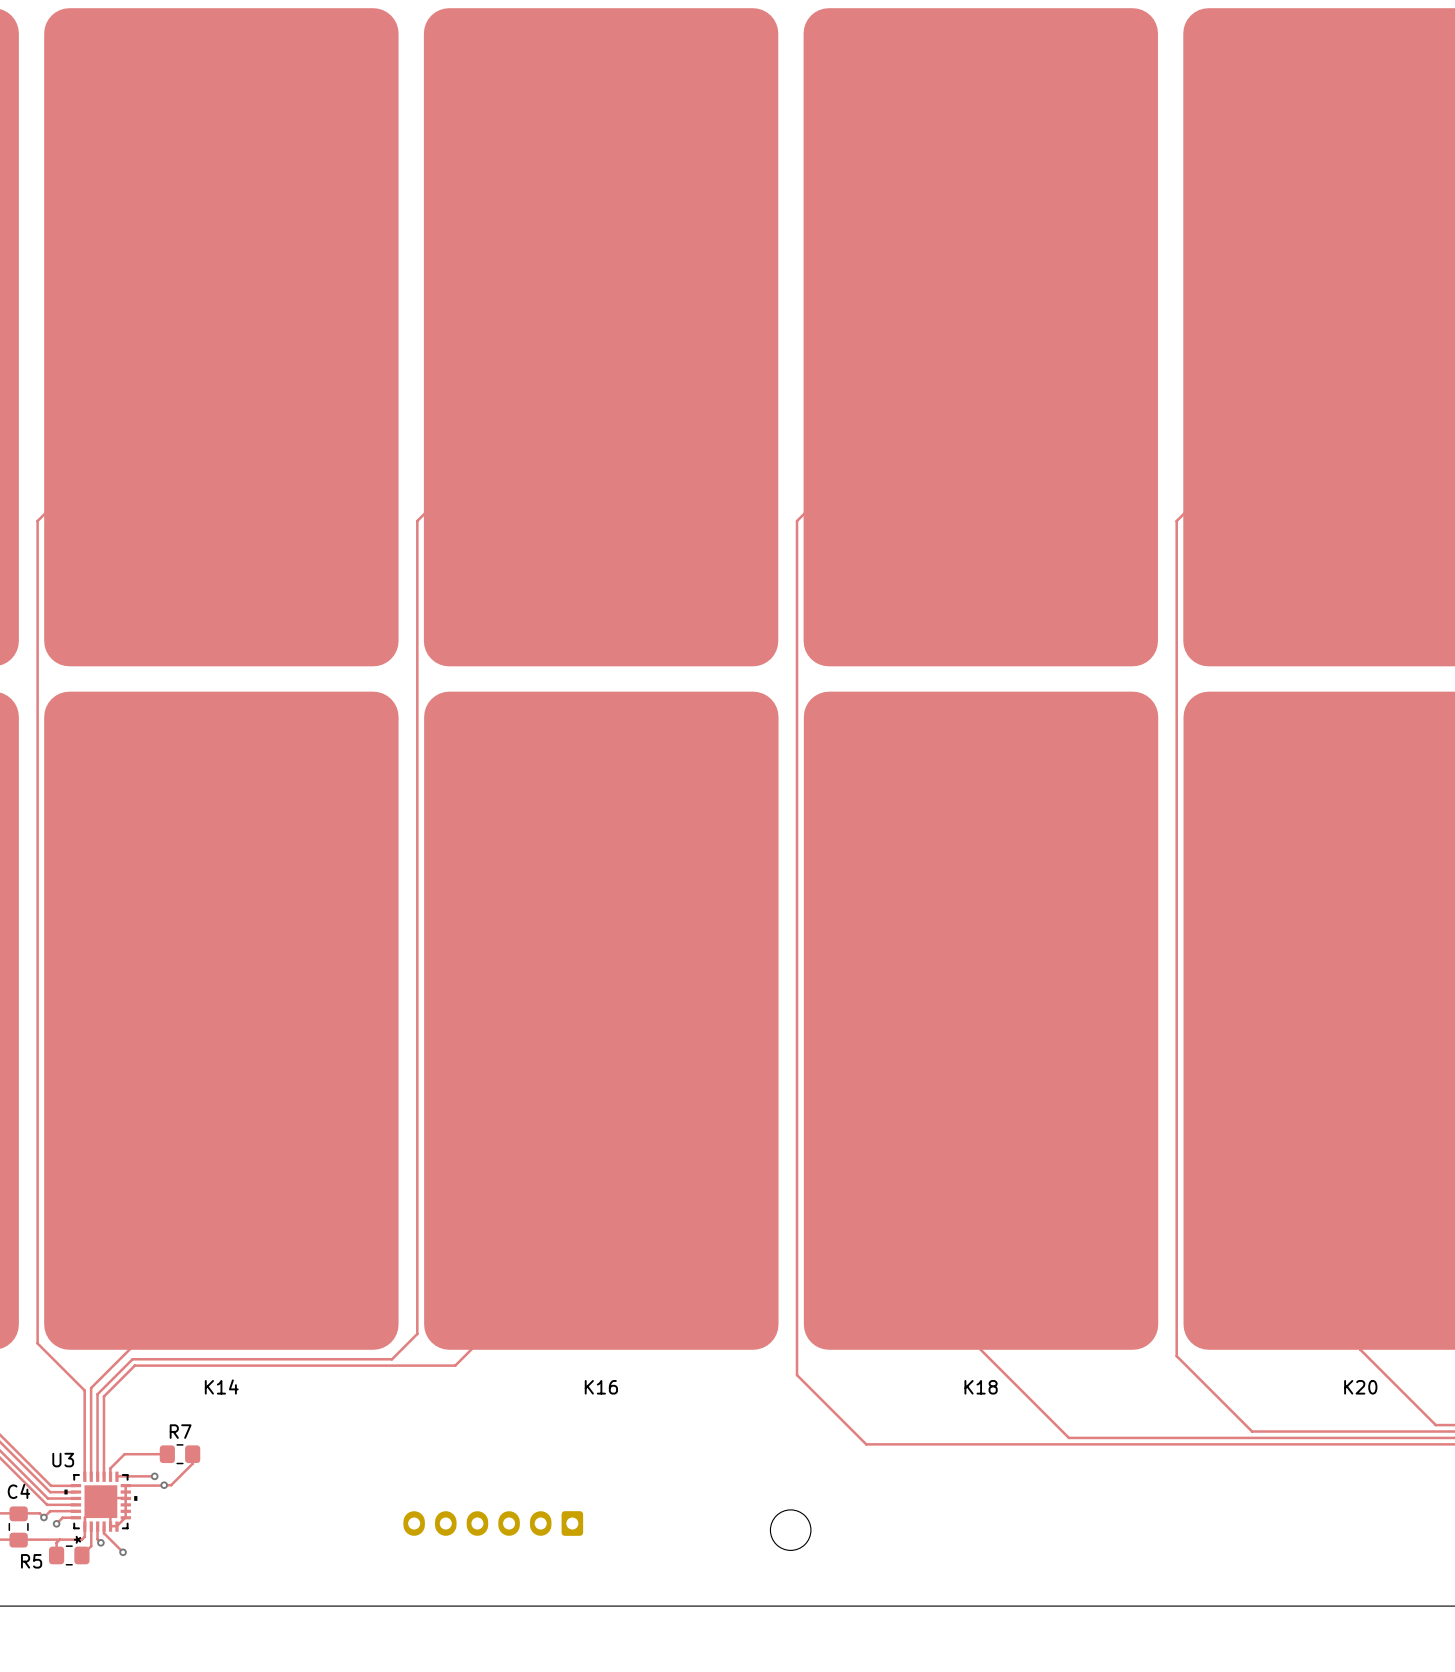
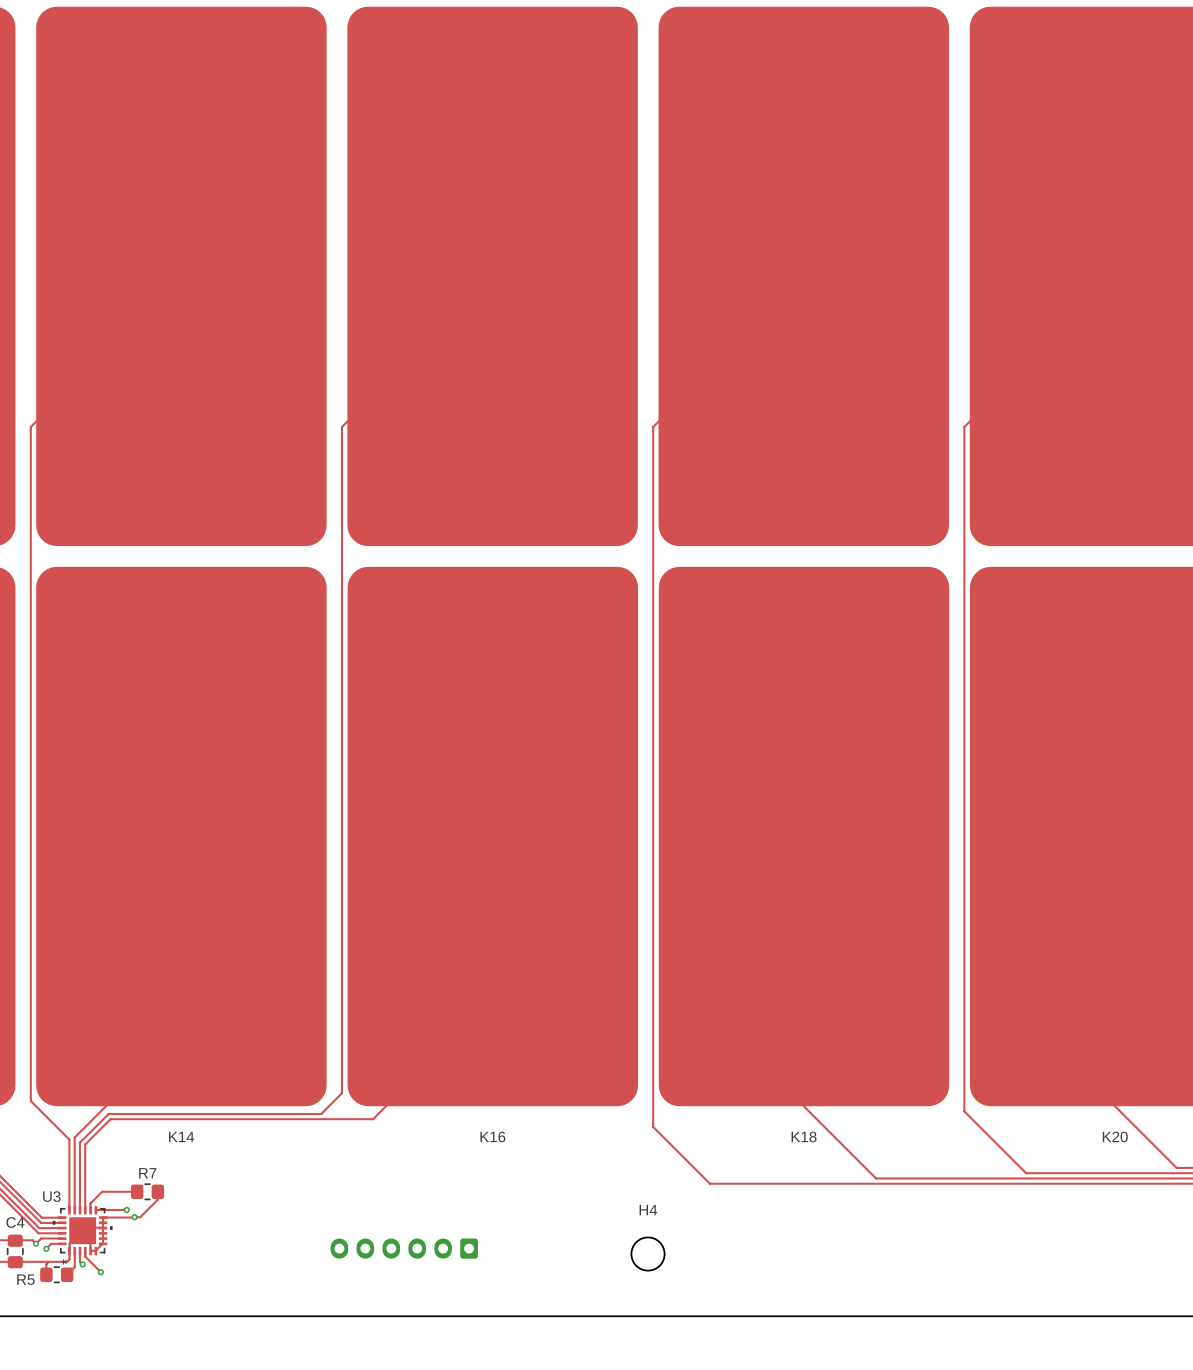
H4 name: none -> H4 (648, 1210)

